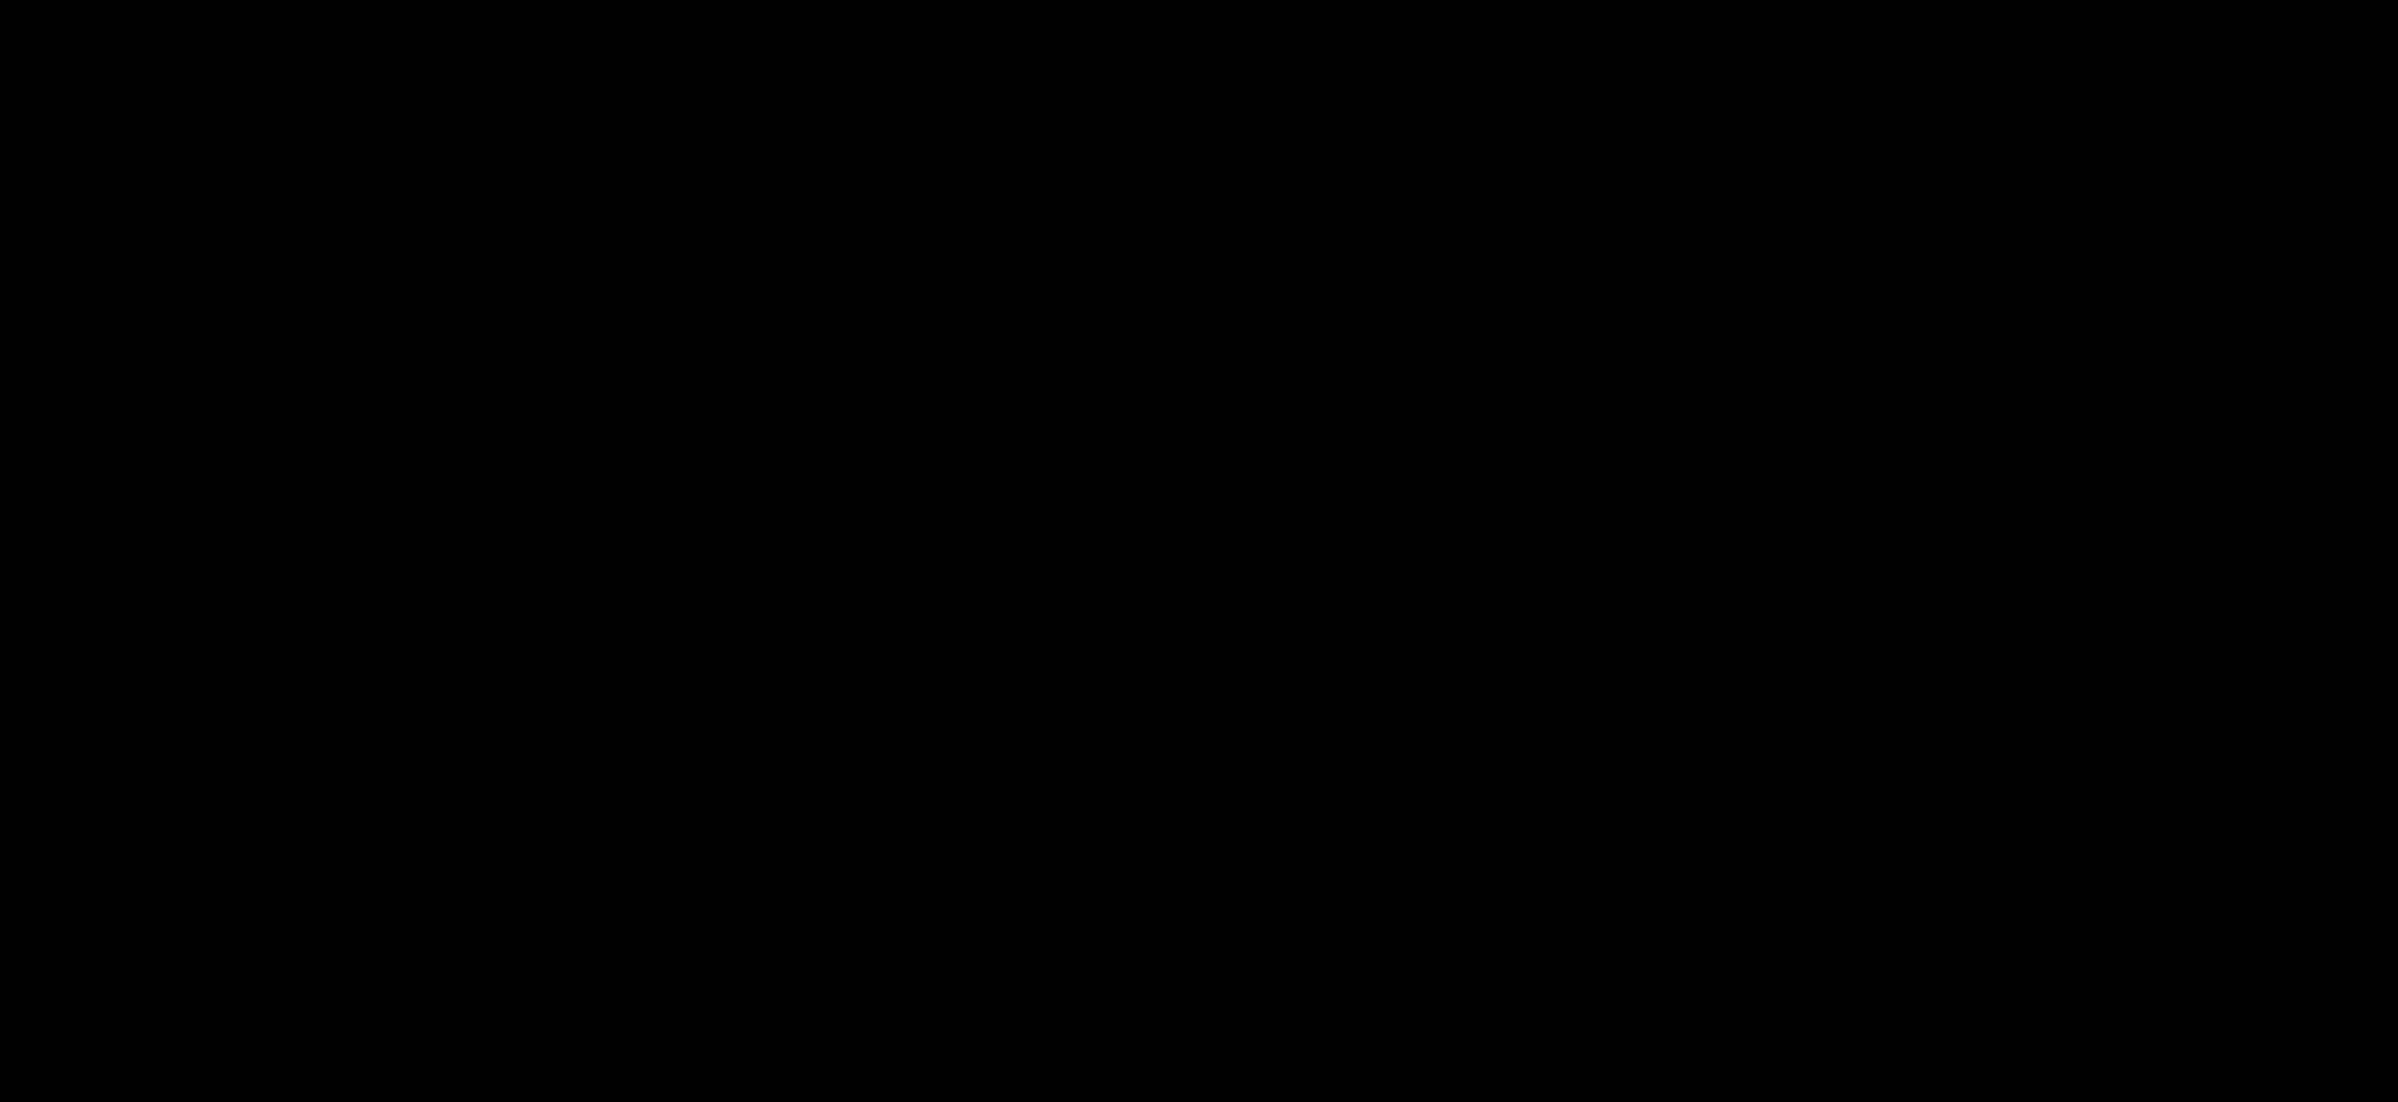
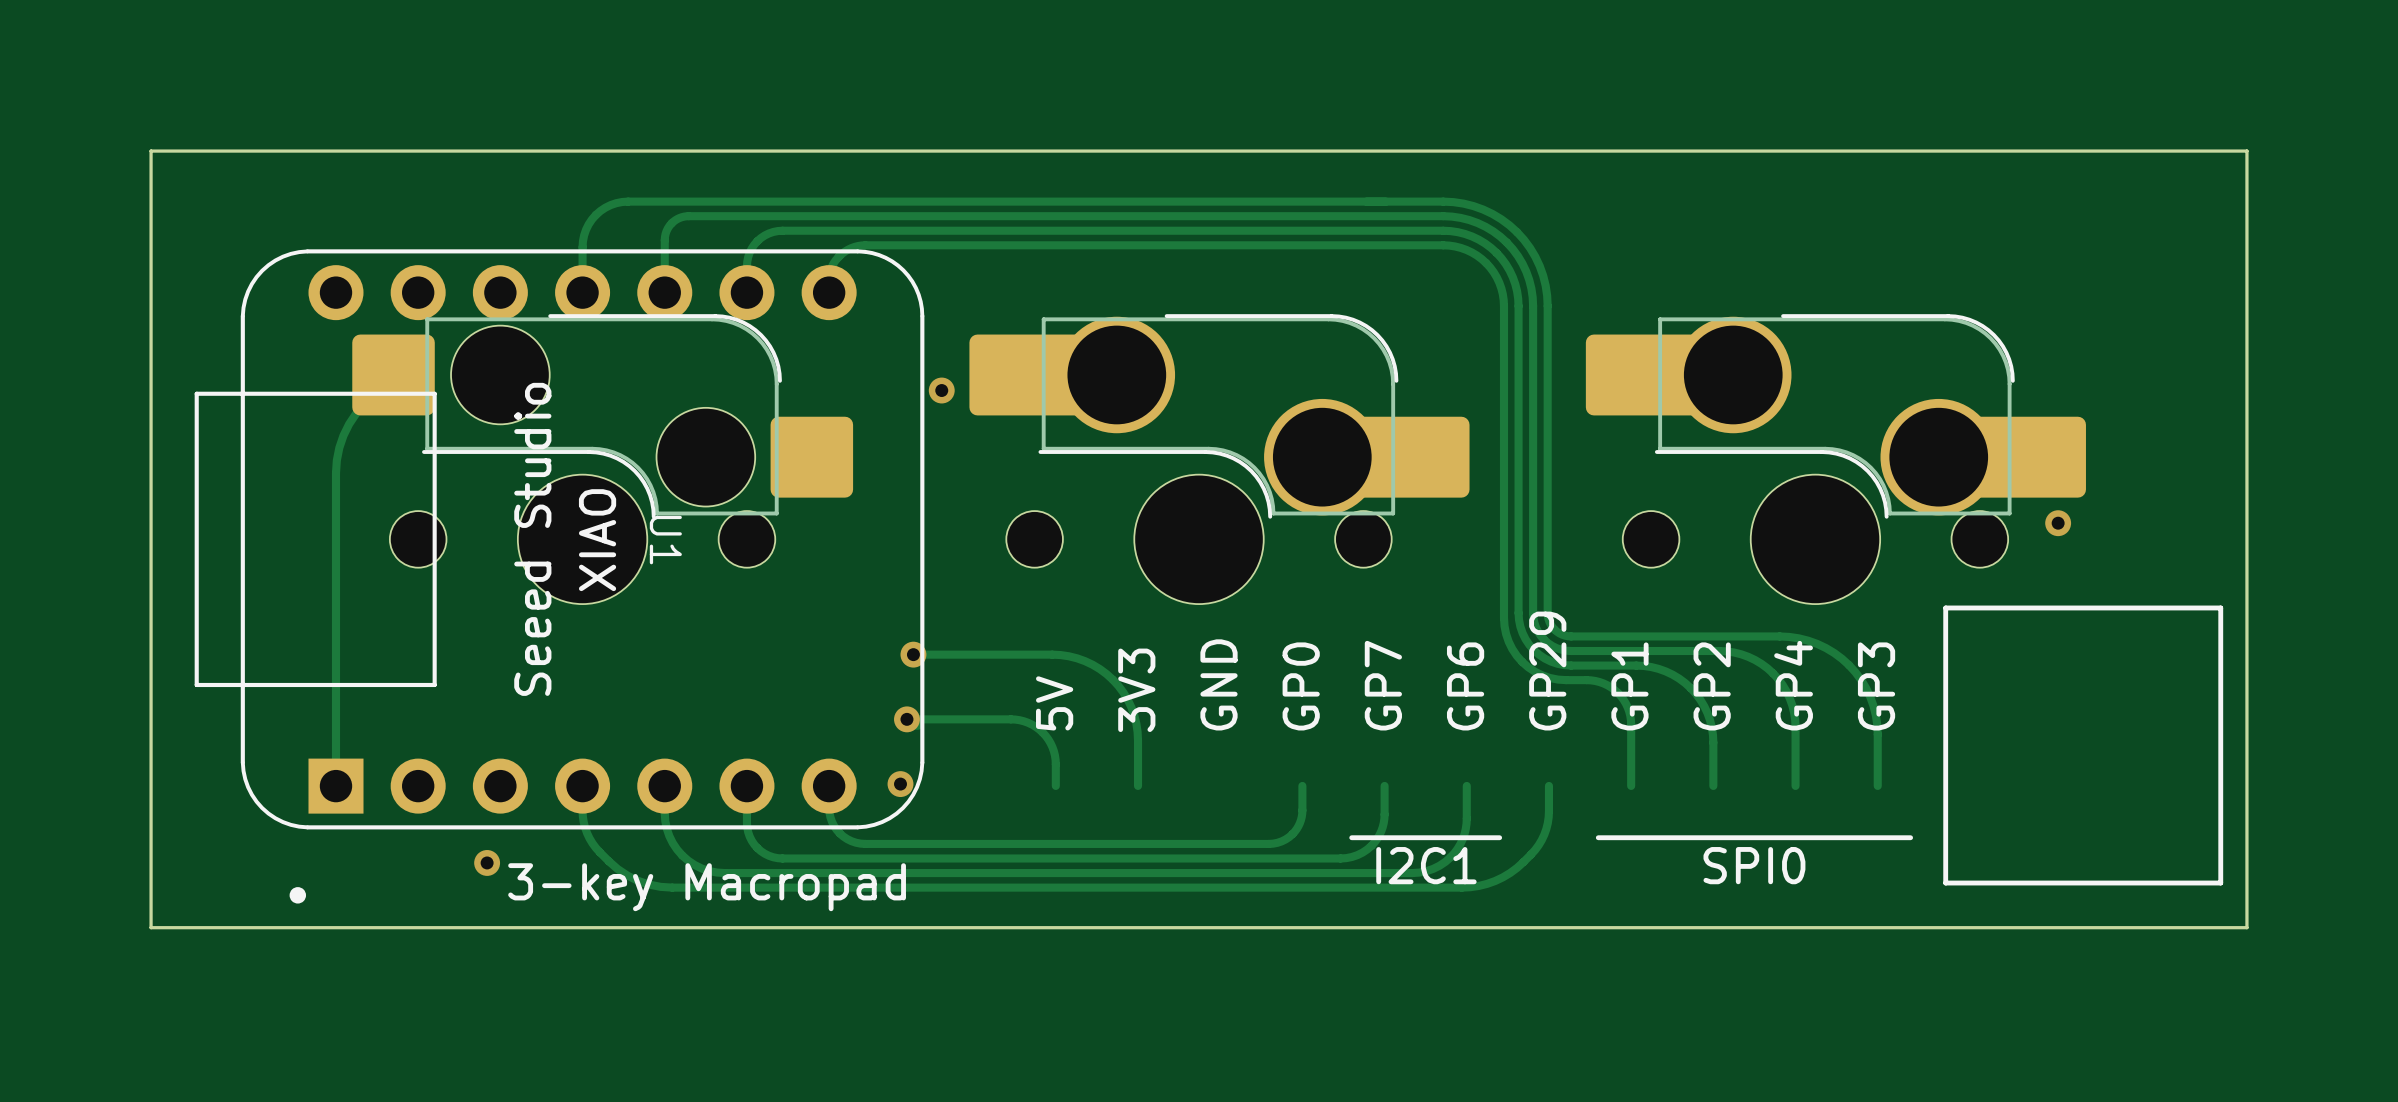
board edge: none -> (2246, 151) (2246, 927) (151, 927) (151, 151) (2246, 151)
track: none -> (582, 292) (582, 247) (586, 229) (591, 219) (600, 211) (610, 205) (622, 202) (1443, 201) (1463, 203) (1483, 209) (1501, 219) (1523, 239) (1539, 266) (1545, 285) (1547, 306) (1547, 612) (1552, 627) (1559, 633) (1571, 636) (1789, 636) (1808, 640) (1825, 648) (1841, 658) (1855, 672) (1870, 696) (1877, 724) (1877, 785)
track: none -> (664, 292) (665, 233) (673, 221) (686, 216) (1443, 216) (1460, 217) (1477, 223) (1500, 236) (1517, 256) (1526, 271) (1532, 297) (1533, 612) (1538, 631) (1548, 643) (1566, 650) (1726, 651) (1755, 660) (1778, 678) (1792, 705) (1795, 727) (1795, 785)
track: none -> (746, 292) (747, 261) (751, 248) (760, 238) (777, 231) (1443, 230) (1457, 232) (1478, 239) (1491, 247) (1505, 264) (1515, 284) (1518, 298) (1518, 612) (1522, 633) (1533, 650) (1544, 658) (1557, 663) (1651, 667) (1672, 674) (1685, 683) (1700, 699) (1710, 720) (1712, 735) (1713, 785)
track: none -> (829, 292) (830, 271) (835, 260) (848, 249) (861, 245) (1443, 245) (1460, 247) (1476, 255) (1490, 267) (1496, 277) (1503, 300) (1503, 617) (1506, 634) (1516, 655) (1535, 671) (1558, 679) (1599, 682) (1611, 687) (1621, 696) (1627, 707) (1630, 720) (1631, 785)
track: none -> (393, 374) (364, 403) (349, 424) (339, 447) (336, 460) (335, 786)
via: none -> (941, 390)
part: none -> (602, 459)
part: none -> (1219, 459)
part: none -> (1835, 459)
via: none -> (2058, 523)
U1: none -> (559, 576)
line: none -> (2220, 607) (1945, 607) (1945, 883) (2220, 883) (2220, 607)
track: none -> (913, 654) (1060, 655) (1077, 658) (1092, 664) (1106, 674) (1118, 686) (1131, 707) (1137, 732) (1138, 785)
via: none -> (913, 654)
text: none -> GP29 (1547, 671)
text: none -> GND (1218, 684)
text: none -> GP7 (1383, 685)
text: none -> GP4 (1793, 685)
text: none -> GP0 (1301, 686)
text: none -> GP6 (1465, 686)
text: none -> GP1 (1629, 686)
text: none -> GP2 (1712, 686)
text: none -> GP3 (1876, 686)
text: none -> 3V3 (1136, 690)
text: none -> 5V (1054, 703)
via: none -> (906, 719)
track: none -> (918, 725) (912, 724) (906, 719) (1010, 719) (1028, 722) (1042, 732) (1052, 747) (1055, 759) (1055, 785)
via: none -> (900, 784)
track: none -> (1302, 785) (1302, 813) (1298, 826) (1285, 839) (1268, 843) (860, 843) (843, 836) (833, 825) (829, 812) (829, 786)
track: none -> (1384, 785) (1384, 818) (1377, 838) (1362, 852) (1351, 857) (1340, 858) (777, 858) (760, 851) (749, 836) (746, 822) (746, 786)
track: none -> (1466, 785) (1466, 823) (1464, 834) (1457, 848) (1439, 865) (1426, 871) (1412, 873) (716, 872) (701, 868) (688, 860) (672, 843) (665, 820) (664, 786)
track: none -> (1548, 785) (1547, 823) (1541, 840) (1535, 850) (1517, 867) (1502, 877) (1478, 885) (1461, 887) (660, 886) (637, 880) (627, 875) (617, 869) (595, 848) (587, 833) (583, 822) (582, 786)
line: none -> (1499, 837) (1351, 837)
line: none -> (1910, 837) (1598, 837)
via: none -> (487, 862)
text: none -> I2C1 (1426, 865)
text: none -> SPI0 (1754, 865)
text: none -> 3-key Macropad (707, 887)

